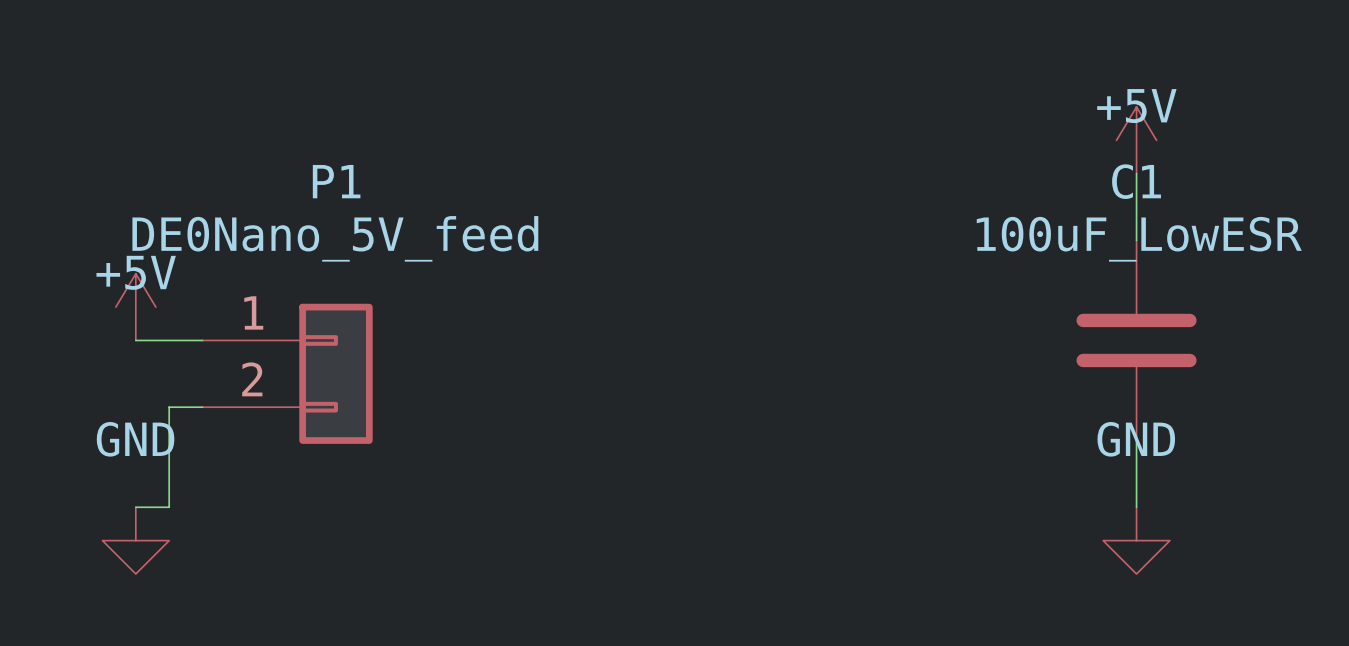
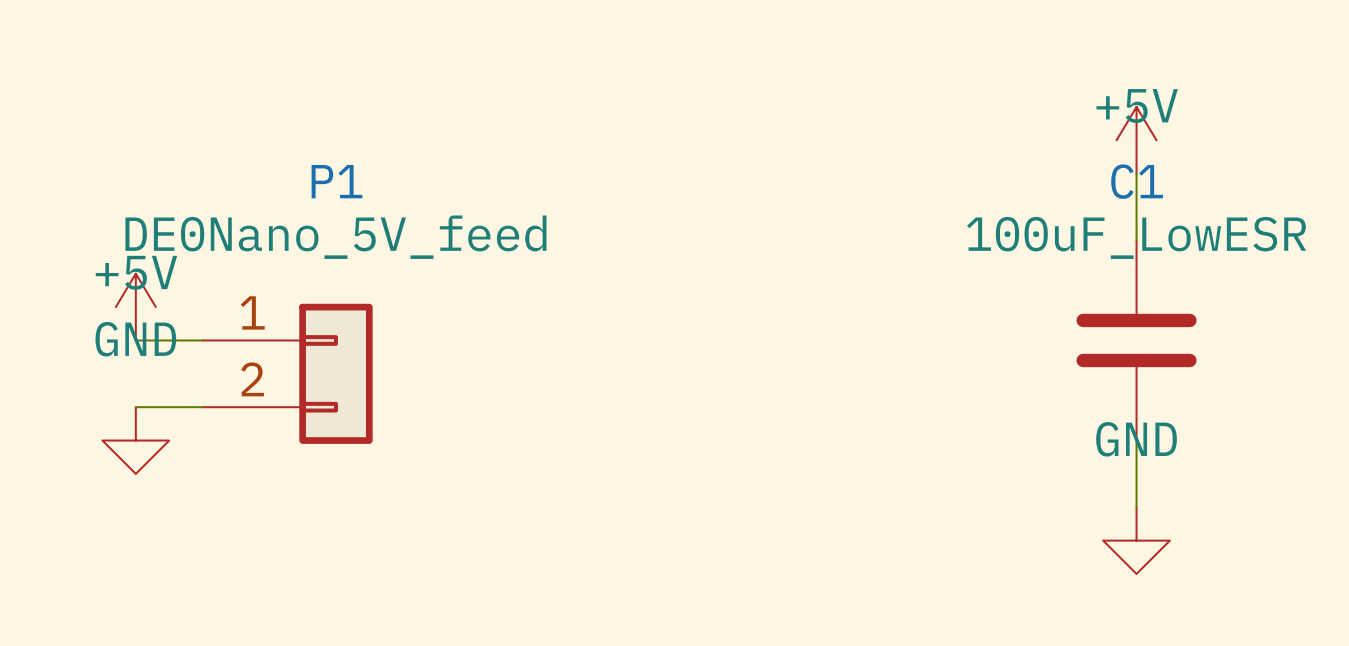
wire: (169, 407) (169, 507) (135, 507) -> (169, 407) (135, 407)
power symbol position: GND (135, 540) -> GND (135, 440)

